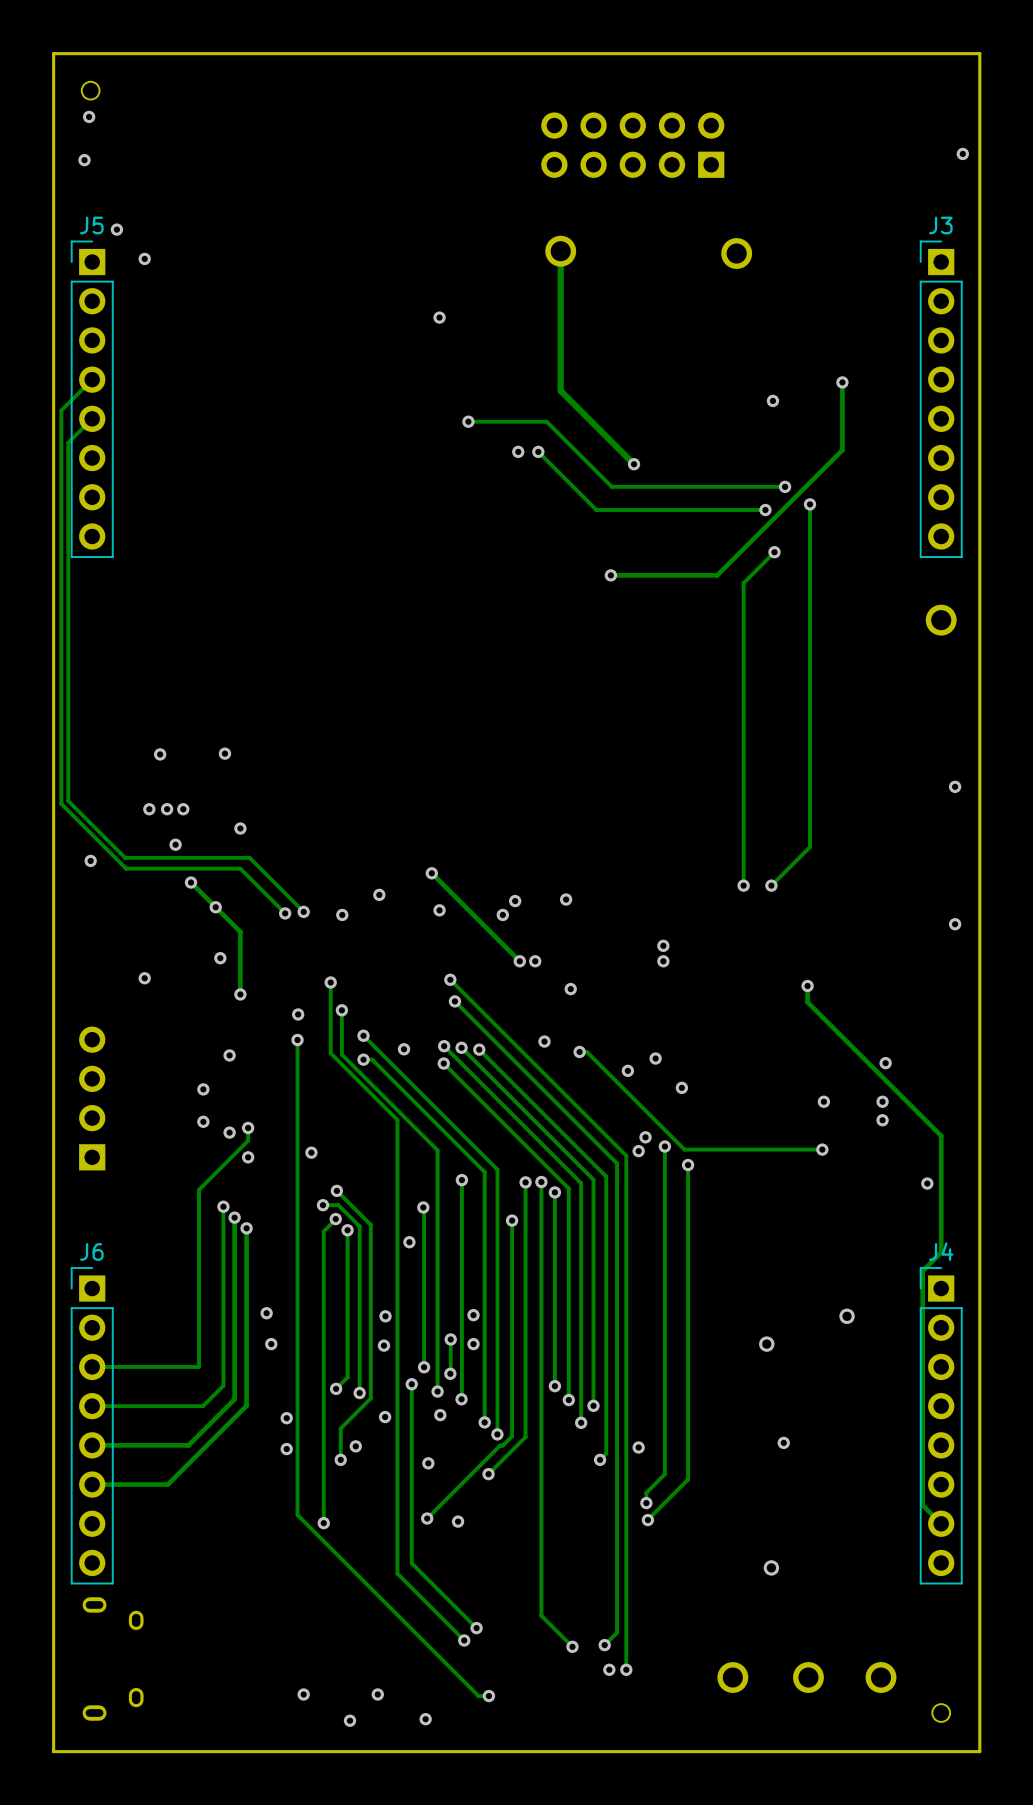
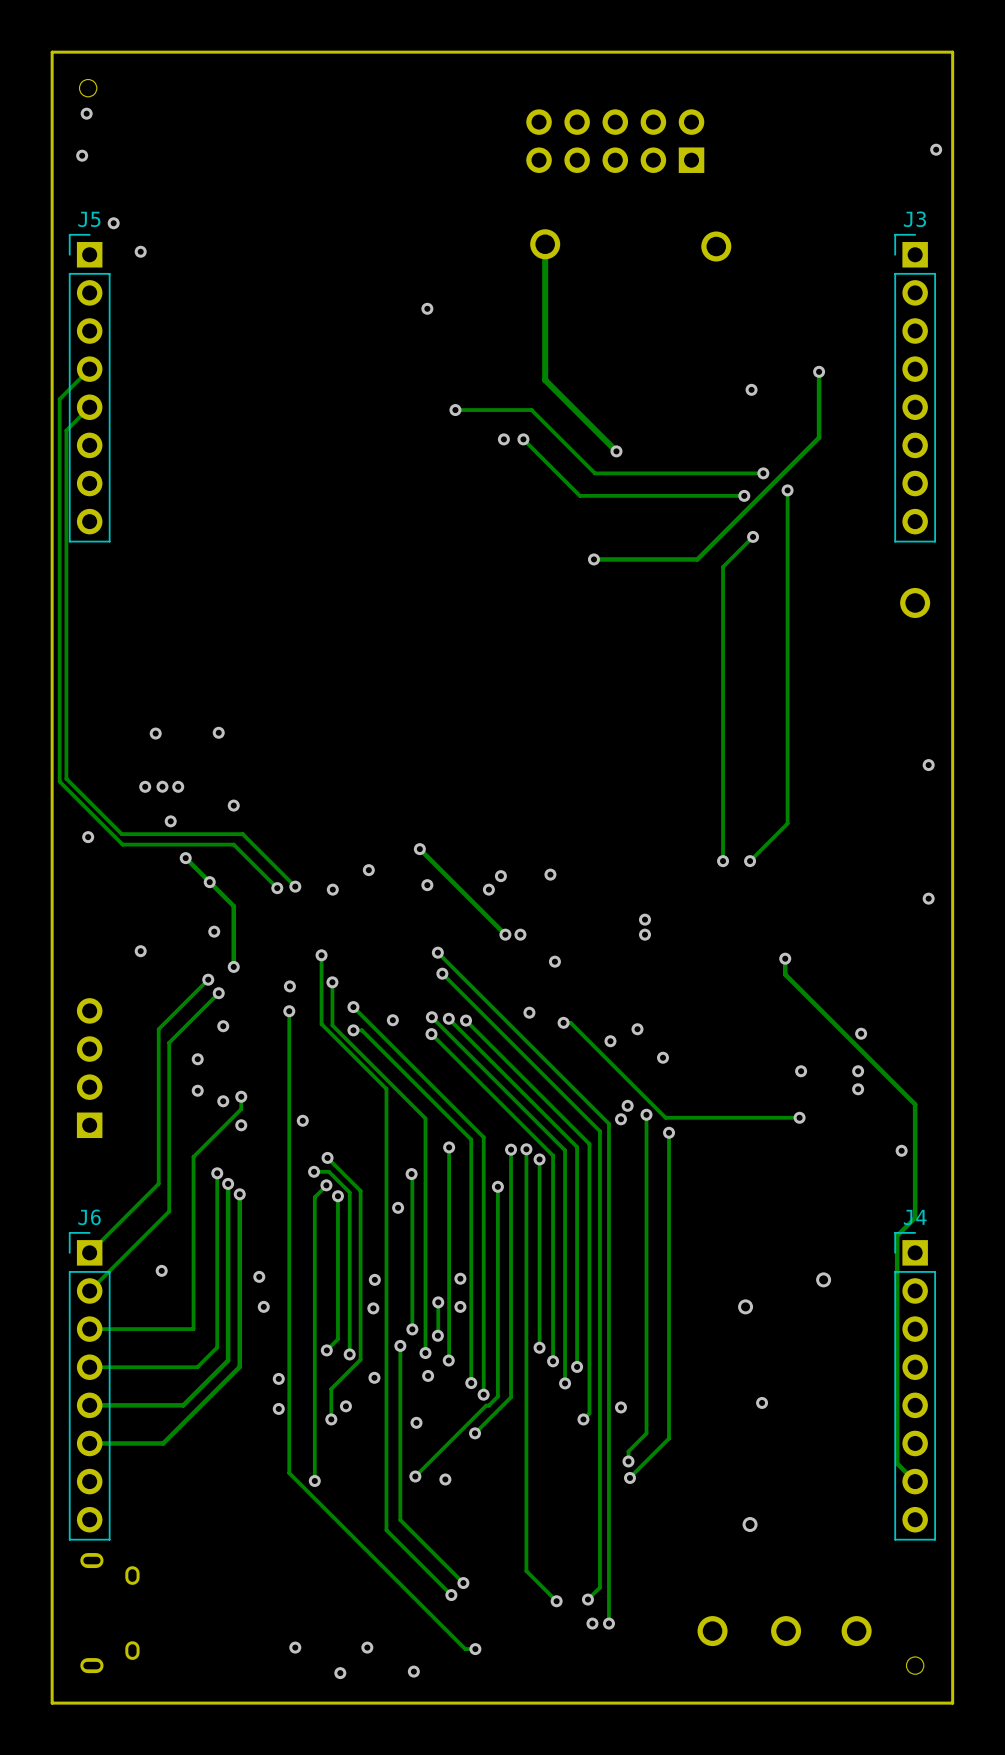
track: none -> (208, 979) (158, 1029) (158, 1183) (89, 1252)
via: none -> (208, 979)
track: none -> (218, 993) (169, 1042) (169, 1211) (89, 1290)
via: none -> (218, 993)
via: none -> (161, 1270)

